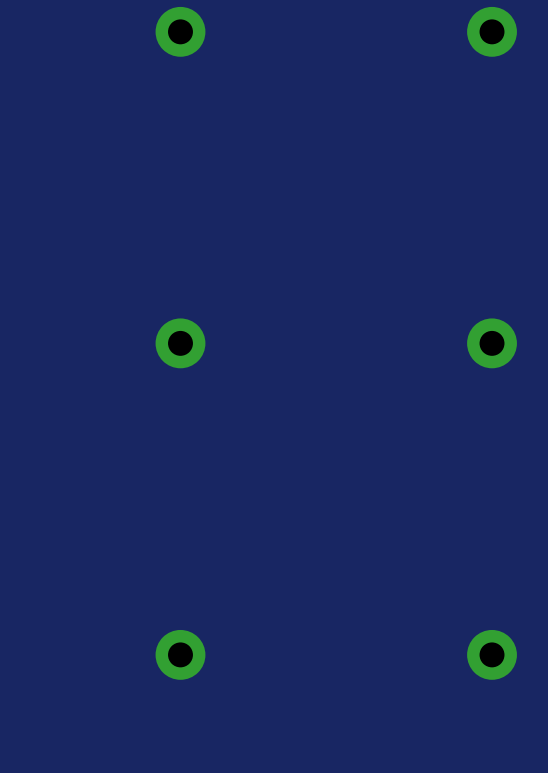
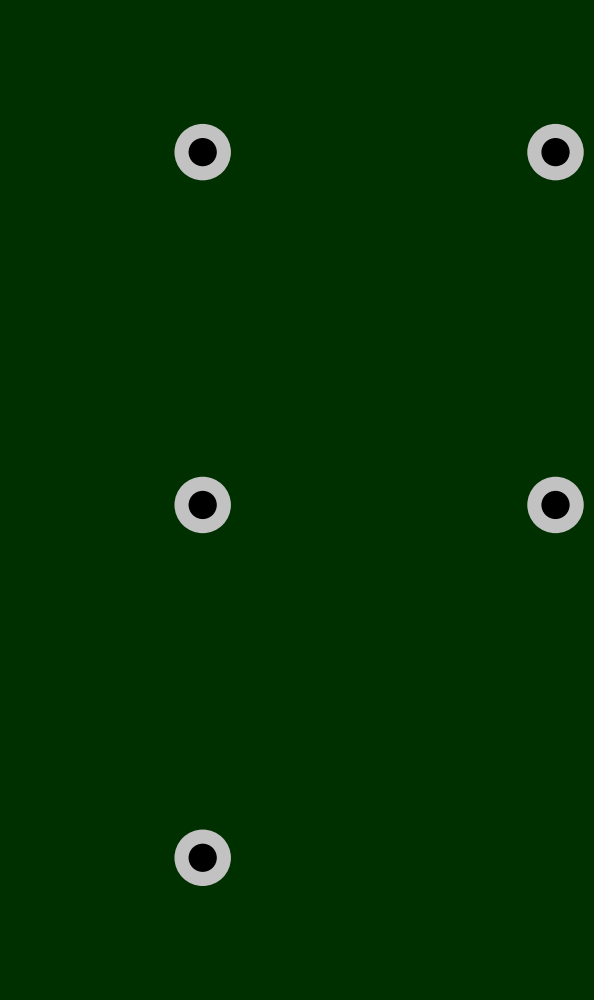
via: (492, 654) -> none

